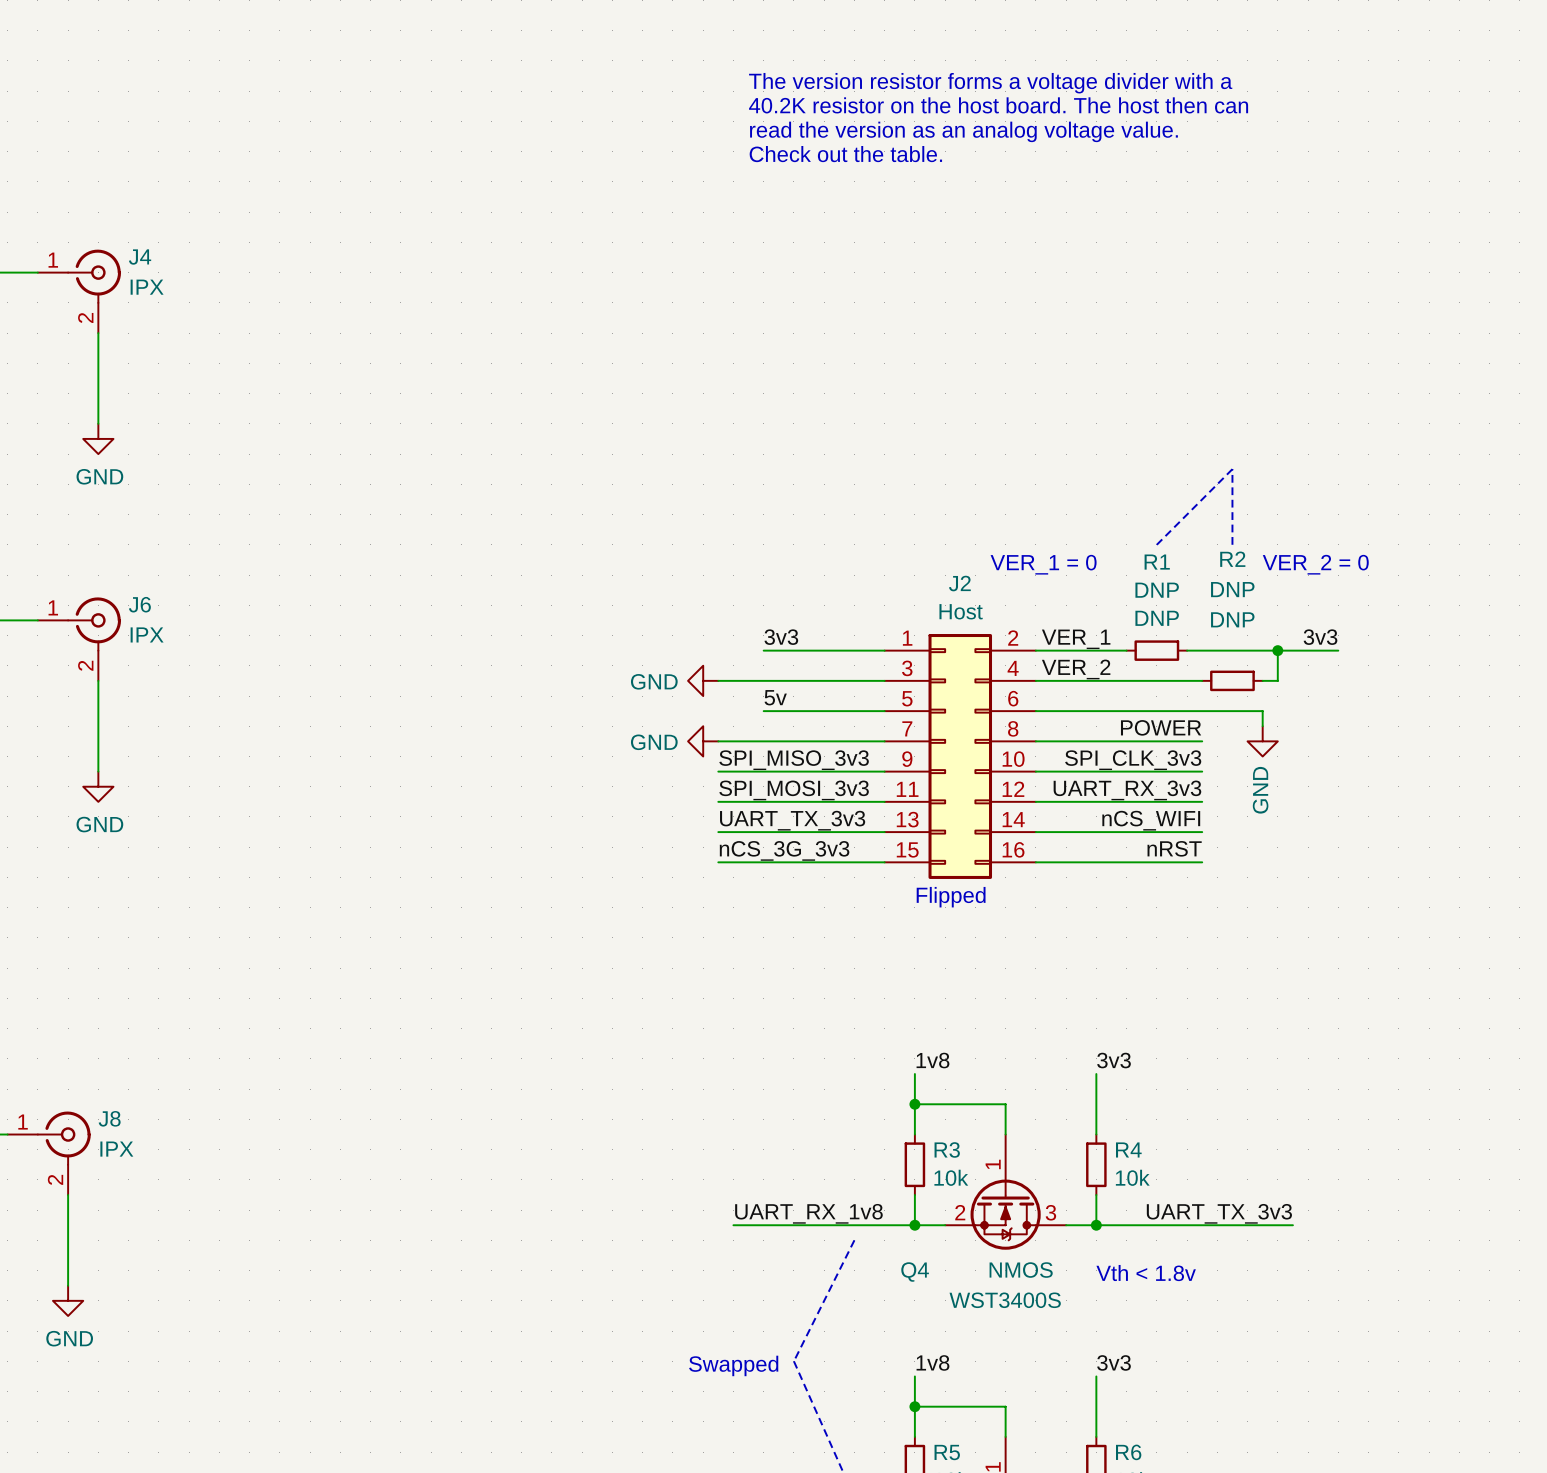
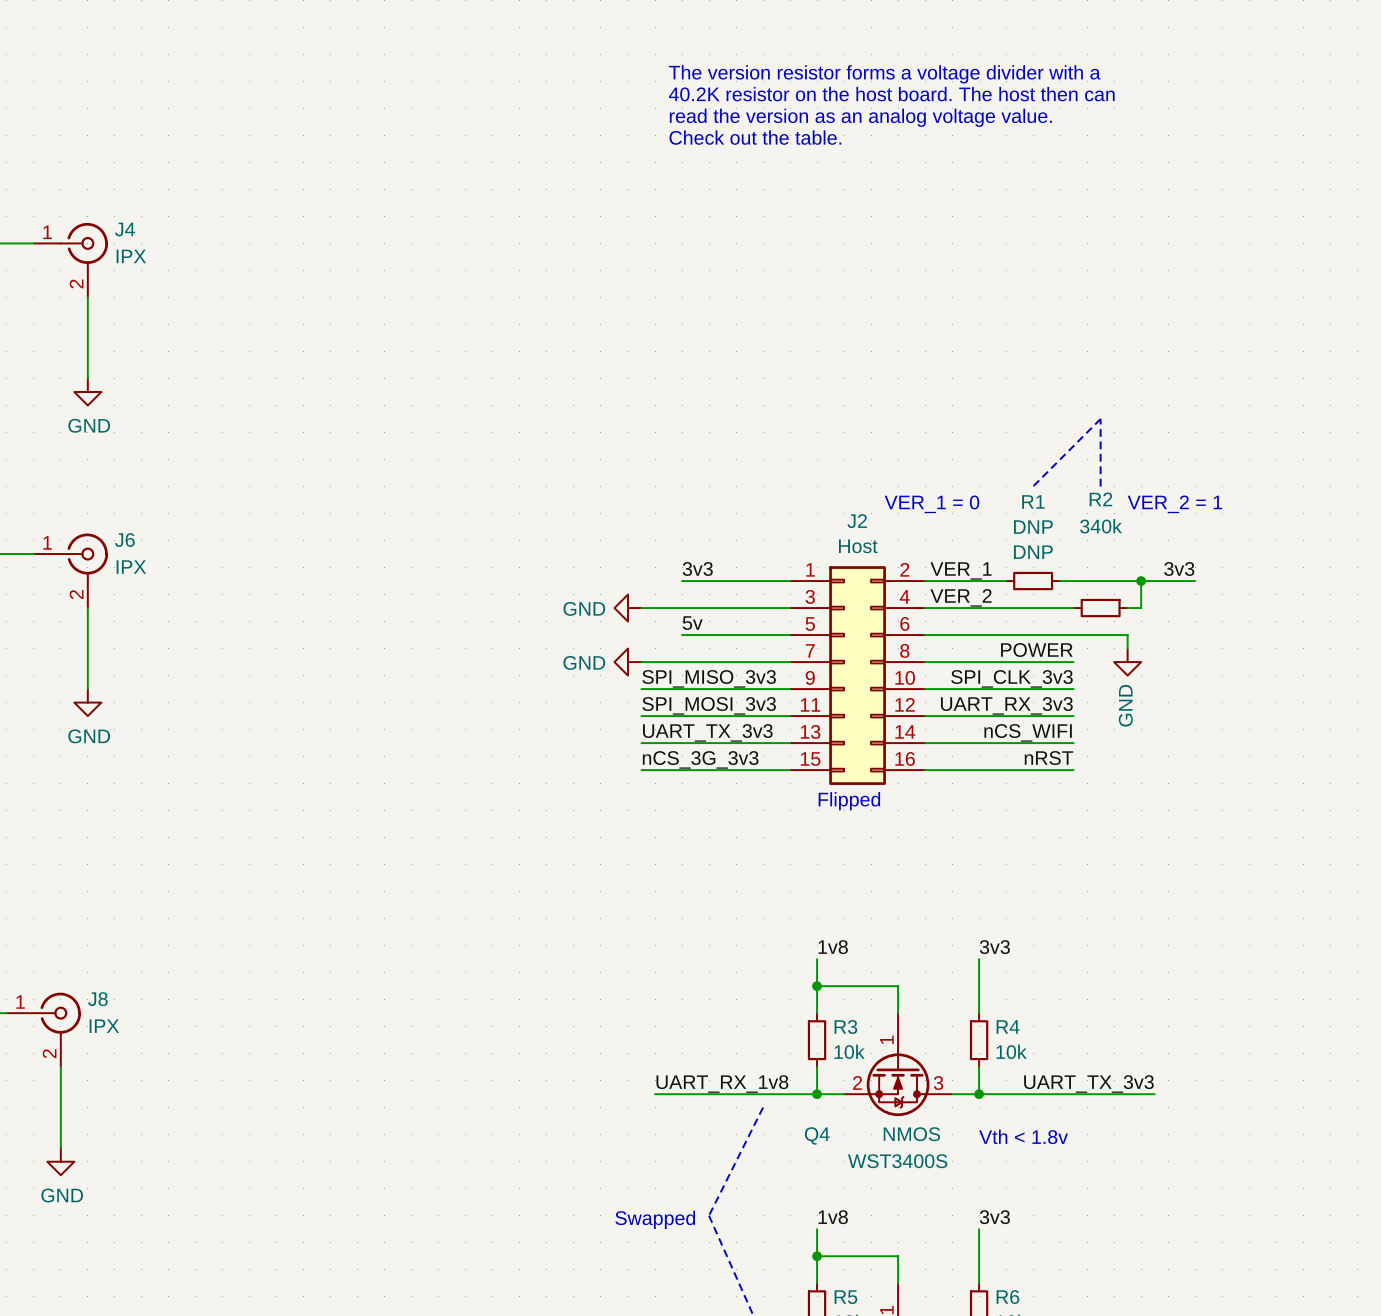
text: VER_2 = 0 (1315, 564) -> VER_2 = 1 (1174, 504)
R2 value: DNP (1232, 589) -> 340k (1101, 526)
R2 text: DNP (1232, 619) -> none

